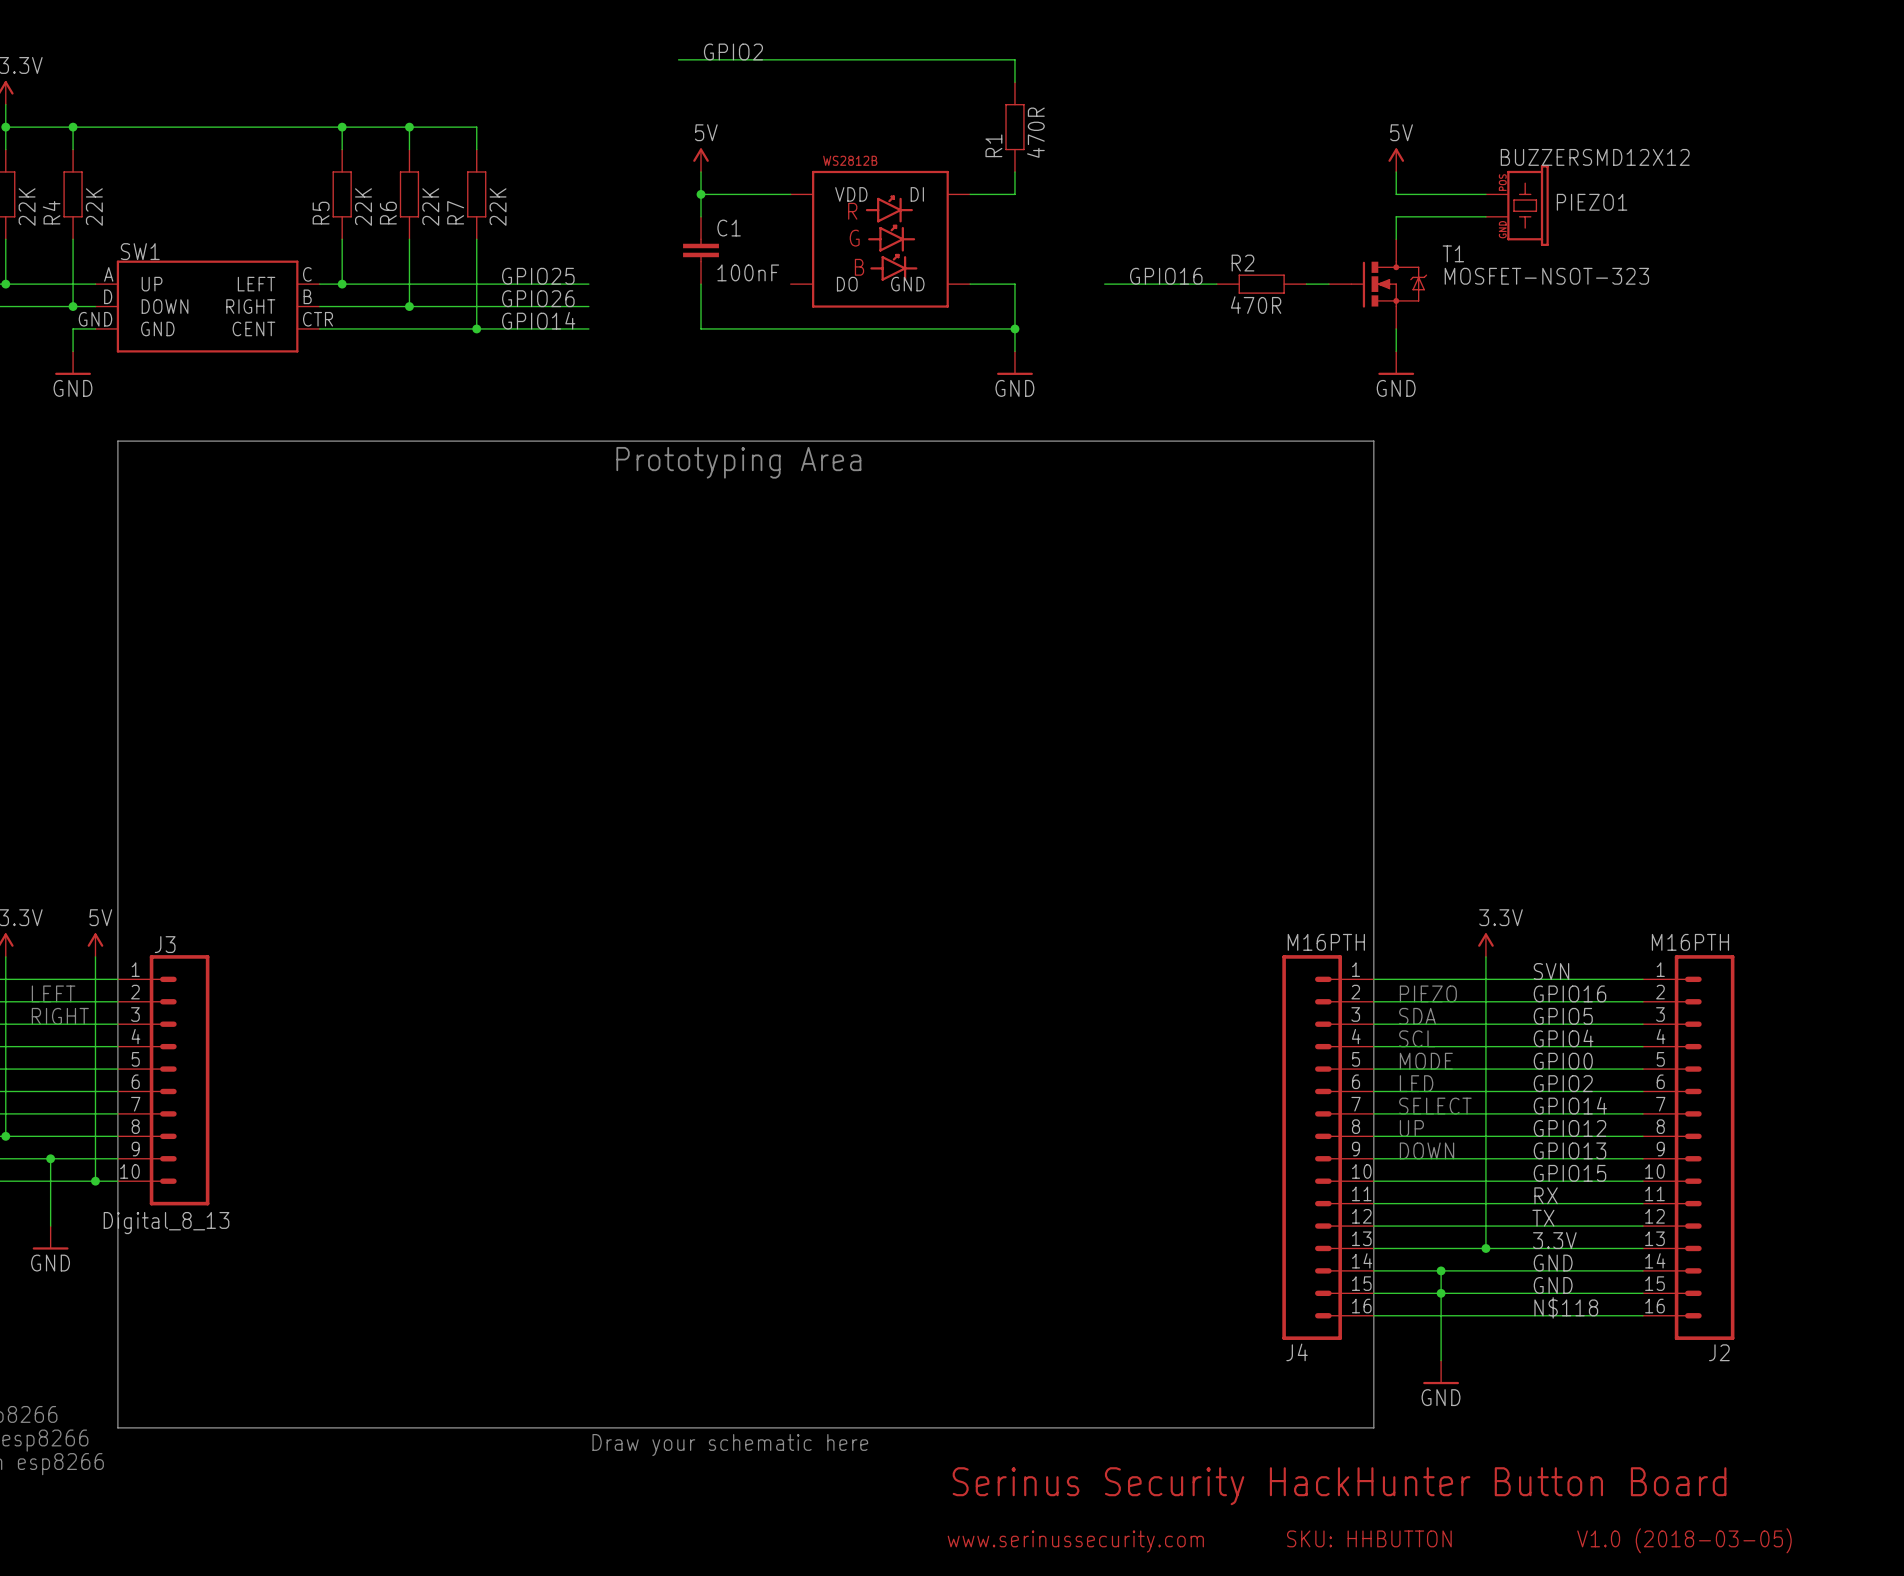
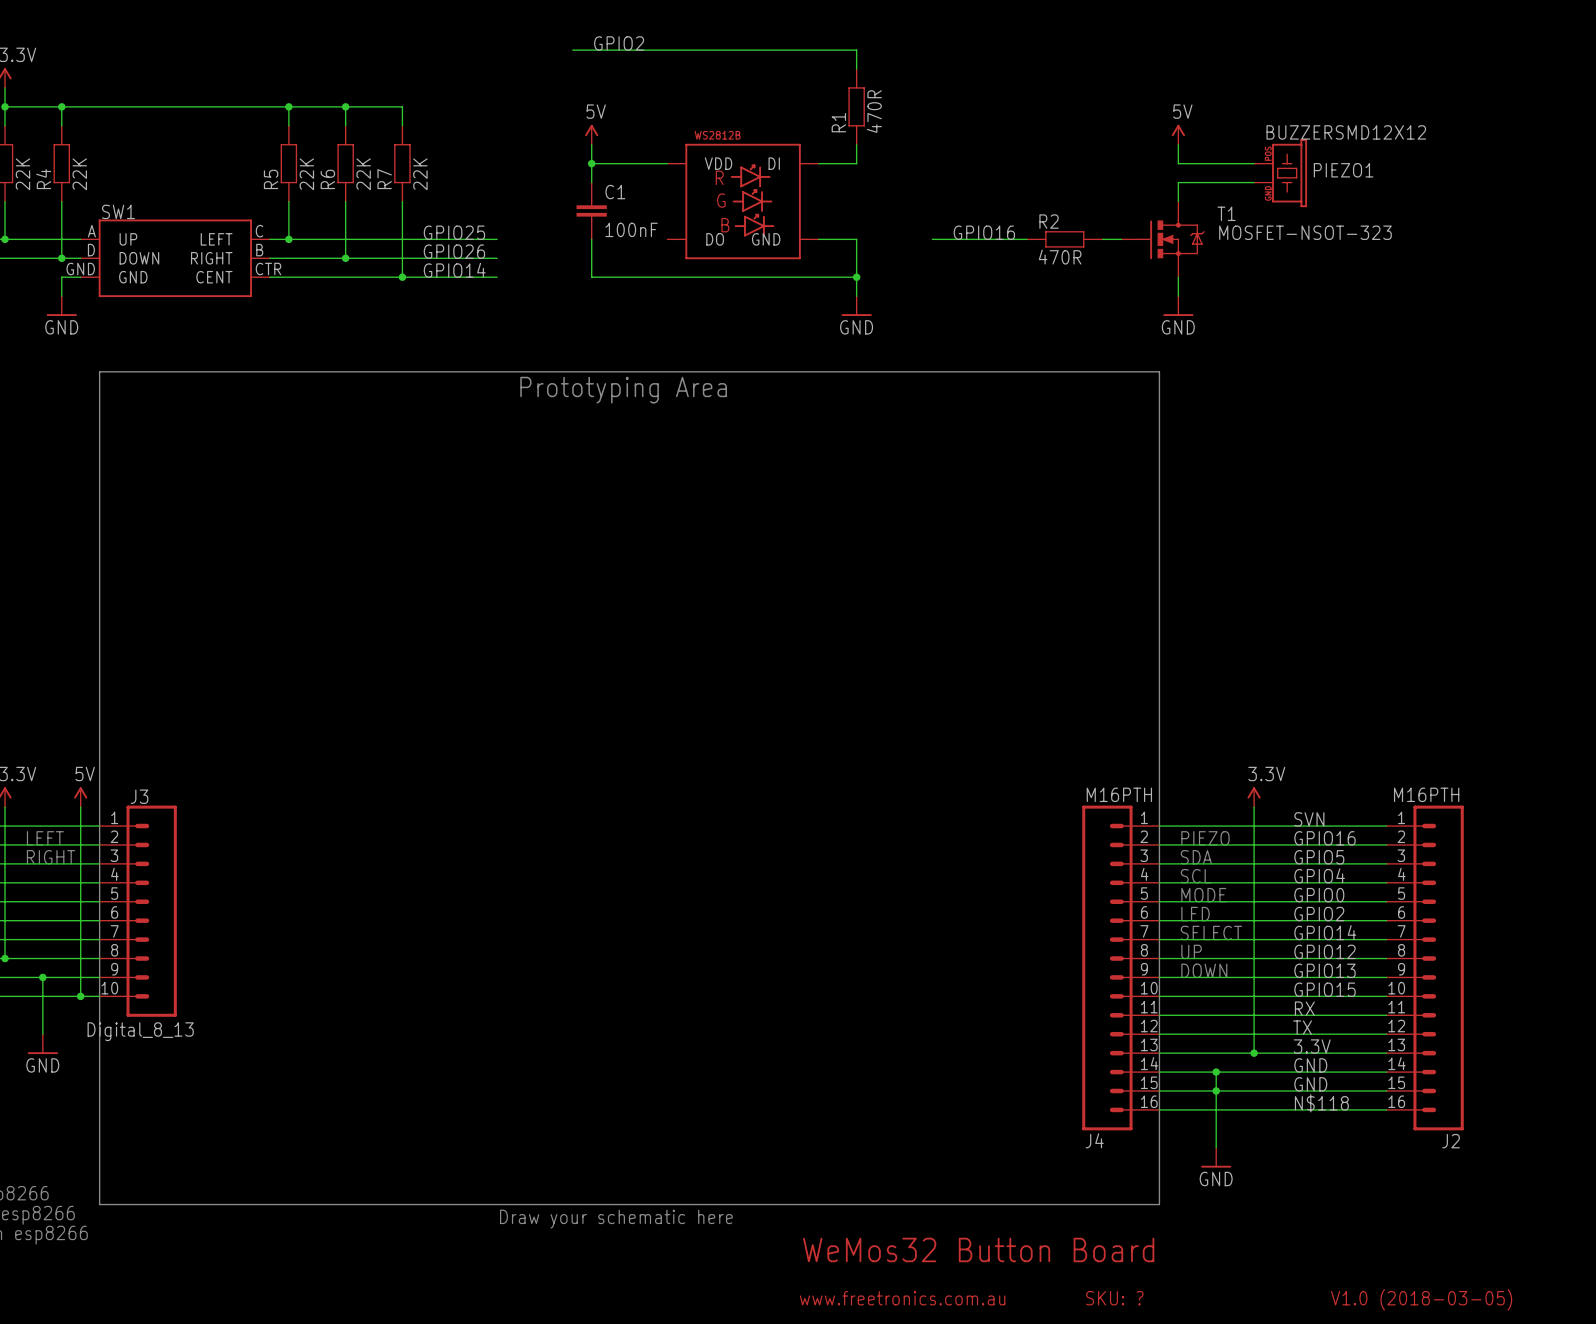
text: Serinus Security HackHunter Button Board (1339, 1486) -> WeMos32 Button Board (978, 1249)
text: SKU: HHBUTTON (1369, 1538) -> SKU: ? (1114, 1298)
text: www.serinussecurity.com (1075, 1541) -> www.freetronics.com.au (902, 1298)

